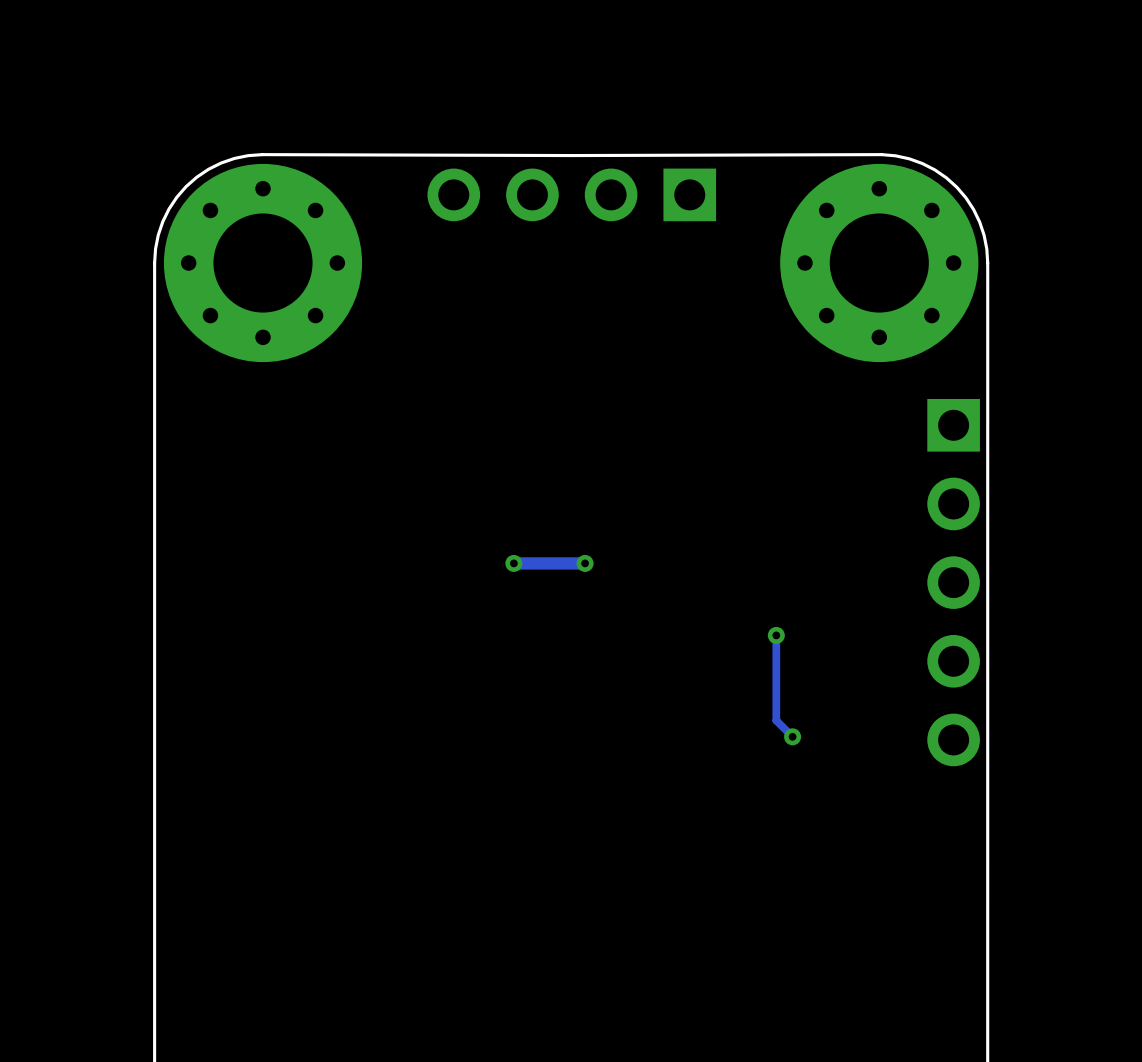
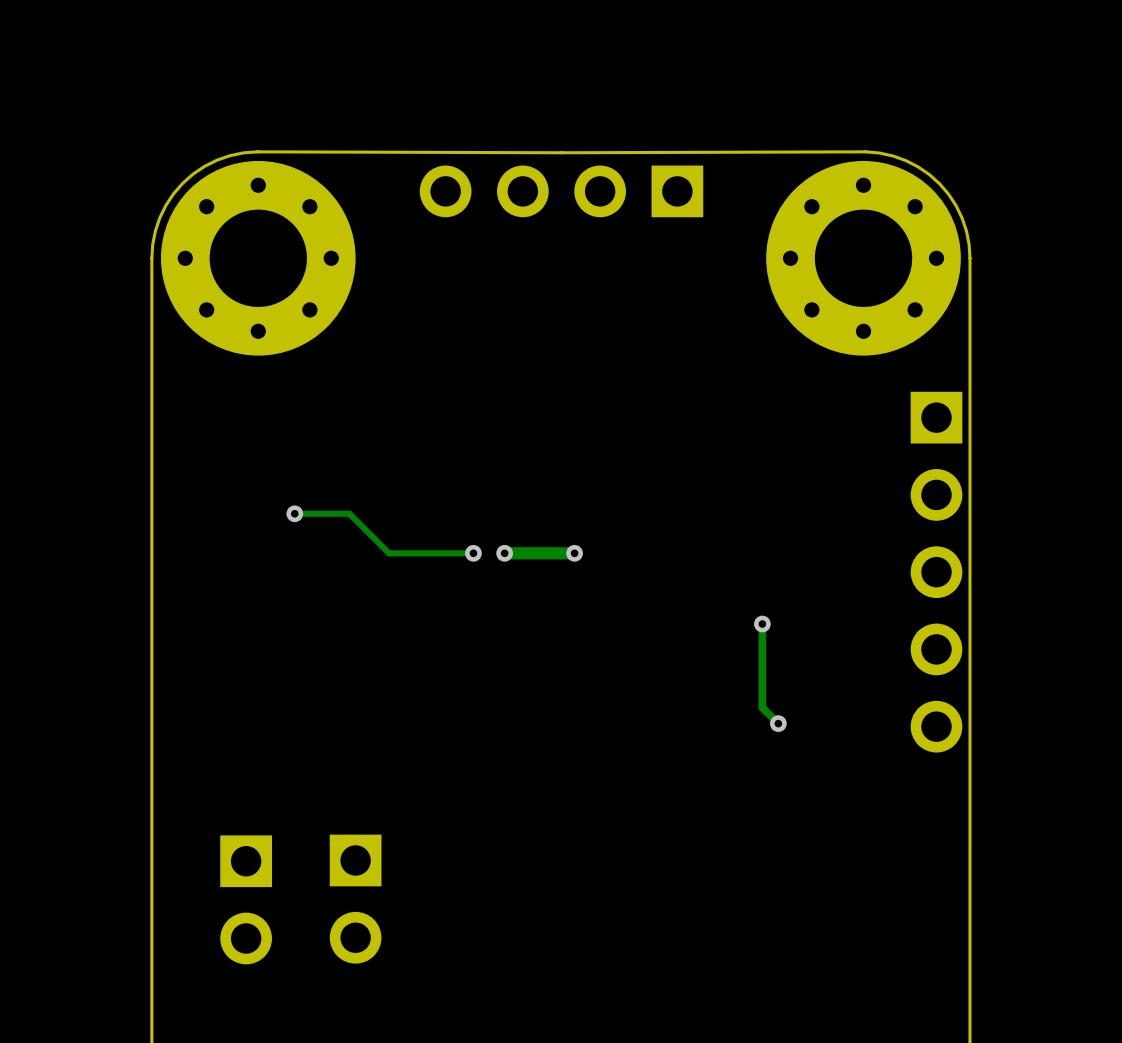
track: none -> (294, 513) (349, 513) (389, 553) (473, 553)
via: none -> (294, 513)
via: none -> (473, 553)
part: none -> (355, 899)
part: none -> (246, 899)

